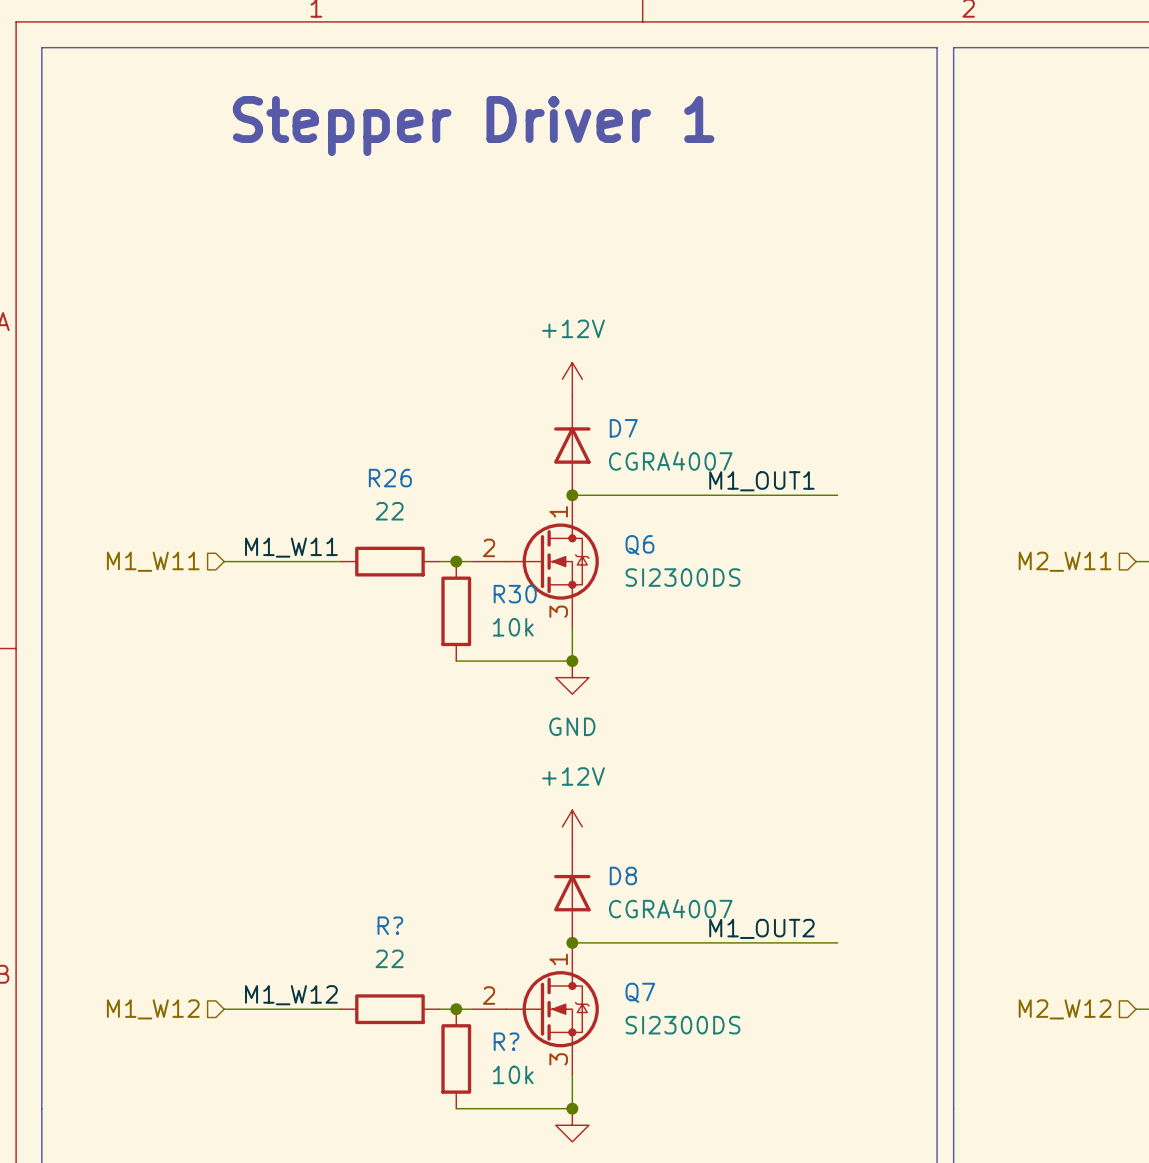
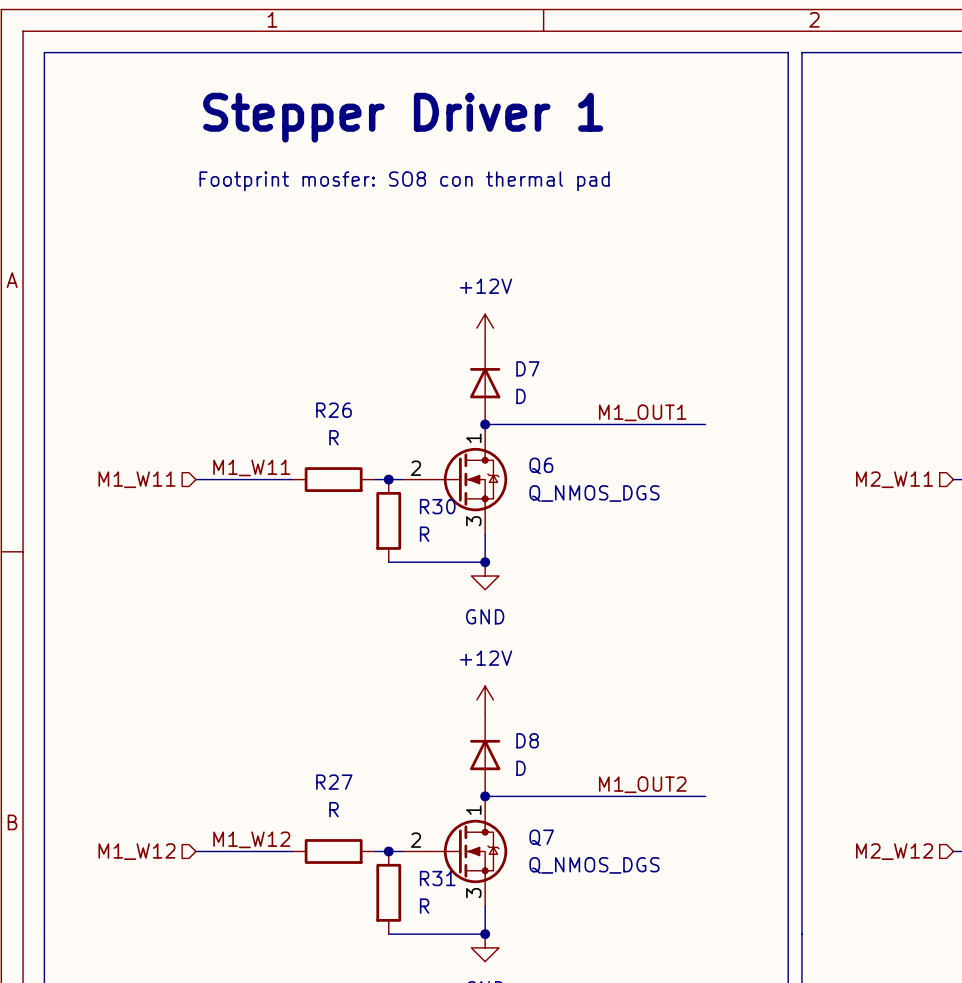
text: none -> Footprint mosfer: SO8 con thermal pad (404, 181)
D7 value: CGRA4007 (670, 461) -> D (521, 396)
R26 value: 22 (389, 511) -> R (333, 437)
Q6 value: SI2300DS (682, 577) -> Q_NMOS_DGS (594, 493)
R30 value: 10k (513, 627) -> R (424, 534)
D8 value: CGRA4007 (670, 908) -> D (521, 768)
R? name: R? (390, 925) -> R27 (334, 782)
R? value: 22 (389, 958) -> R (333, 809)
Q7 value: SI2300DS (682, 1025) -> Q_NMOS_DGS (594, 865)
R? name: R? (506, 1041) -> R31 (437, 878)
R? value: 10k (513, 1074) -> R (424, 906)

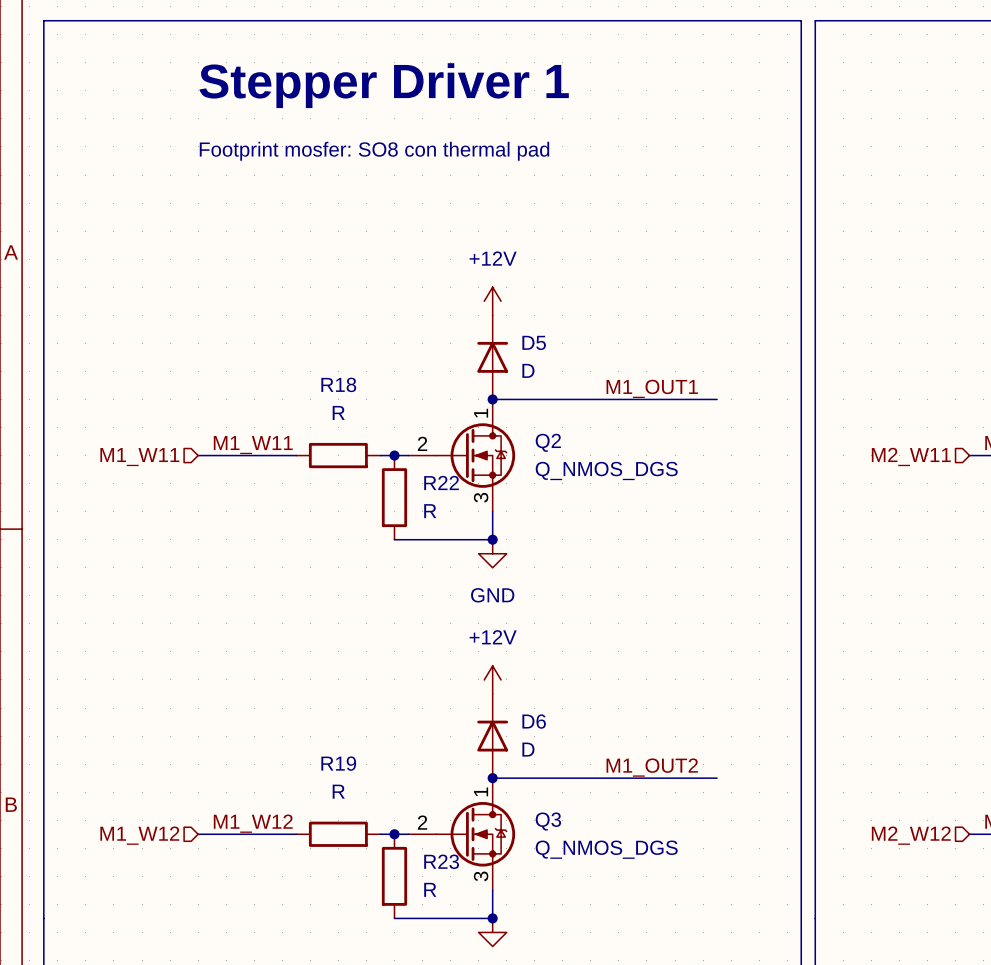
D7 name: D7 (527, 368) -> D5 (534, 342)
R26 name: R26 (333, 410) -> R18 (338, 384)
Q6 name: Q6 (541, 465) -> Q2 (548, 442)
R30 name: R30 (437, 506) -> R22 (441, 482)
D8 name: D8 (527, 740) -> D6 (534, 721)
R27 name: R27 (334, 782) -> R19 (338, 763)
Q7 name: Q7 (541, 837) -> Q3 (548, 821)
R31 name: R31 (437, 878) -> R23 (441, 861)

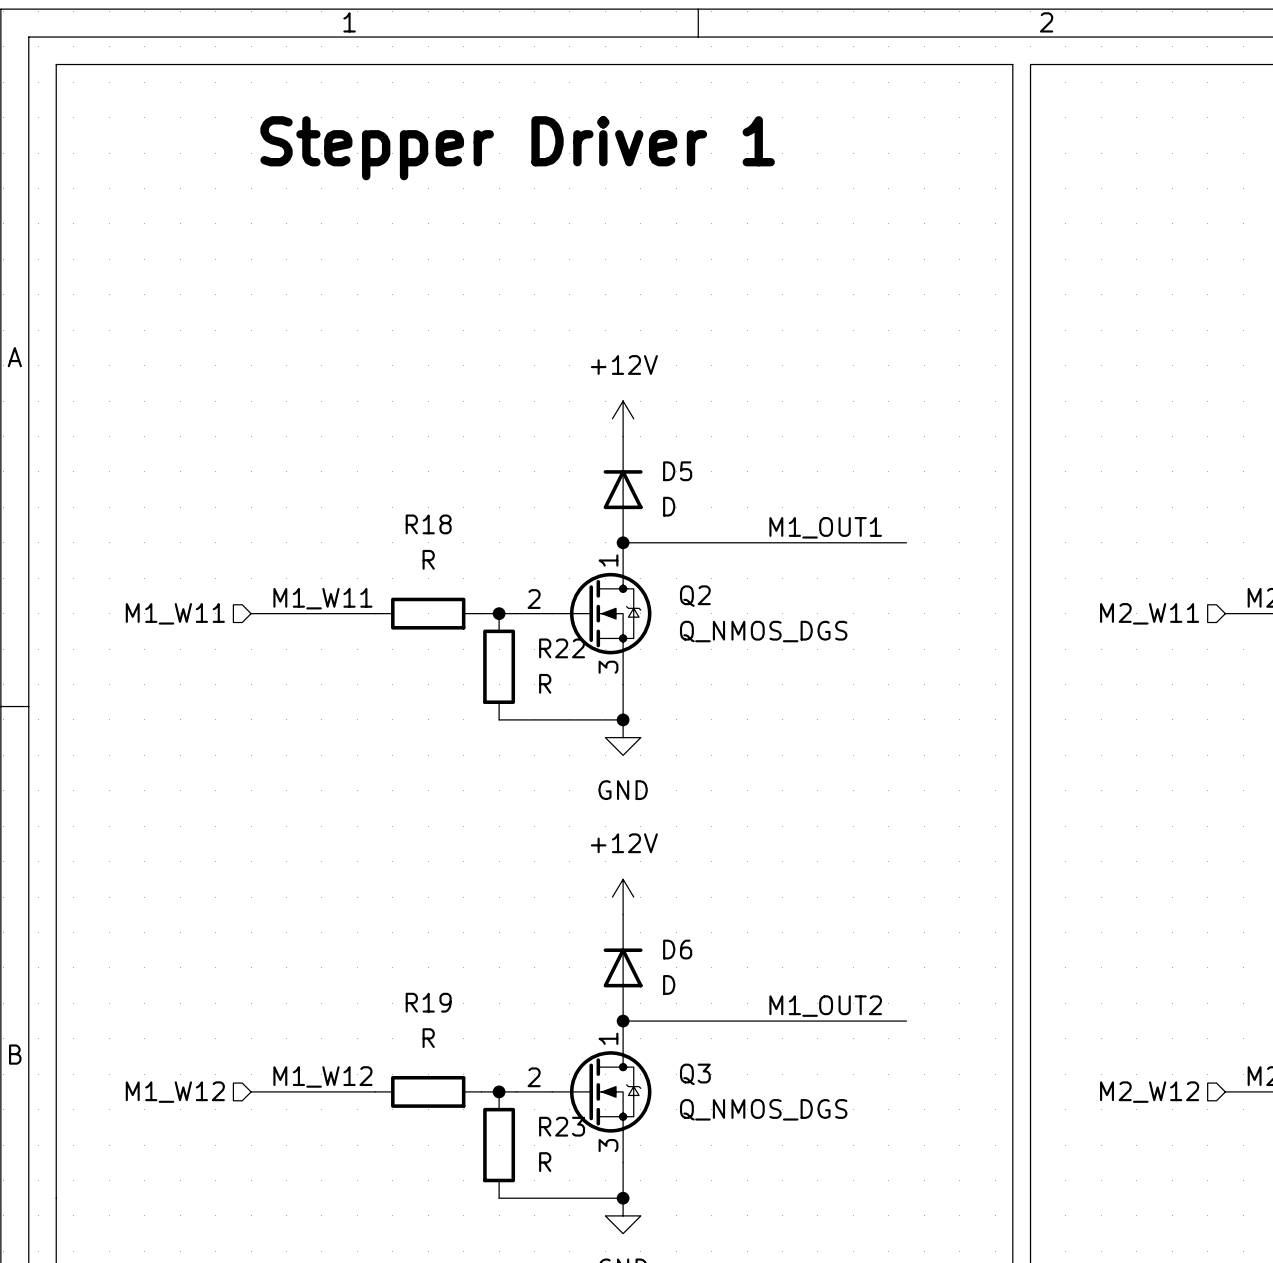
text: Footprint mosfer: SO8 con thermal pad (374, 151) -> none

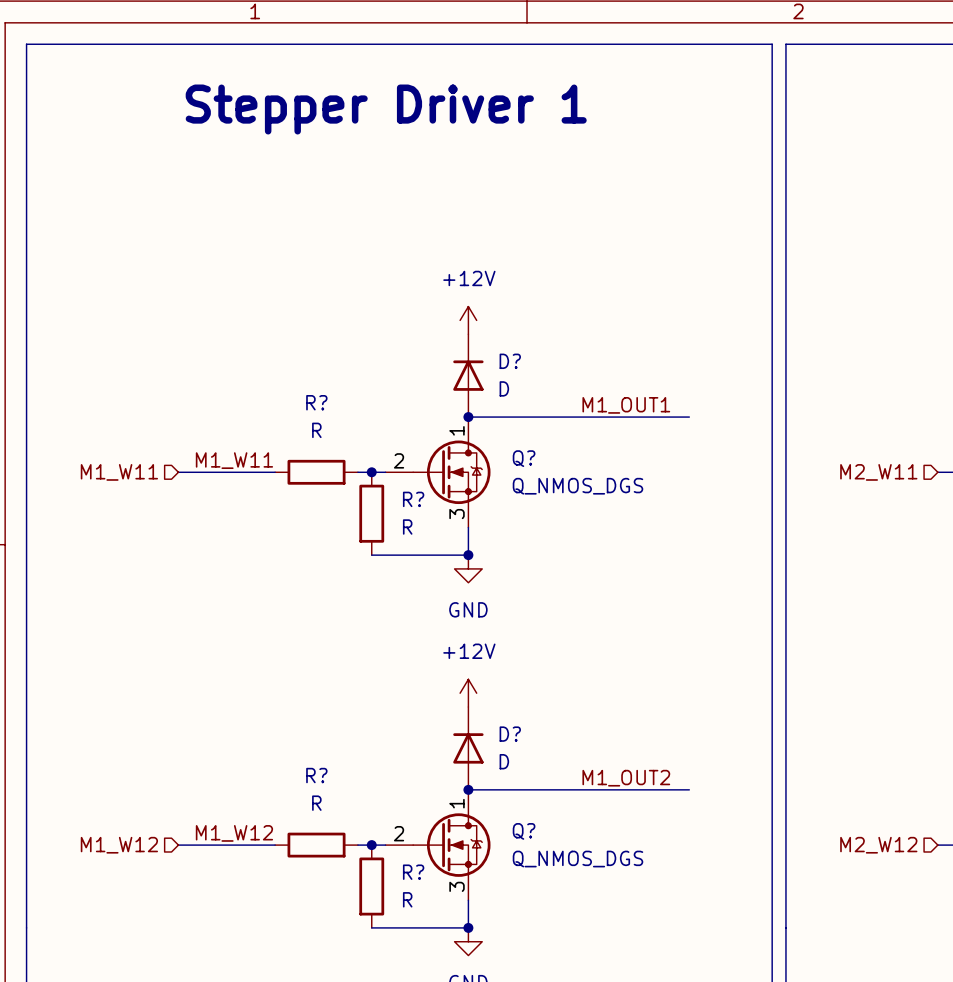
D5 name: D5 (677, 471) -> D? (510, 361)
R18 name: R18 (428, 524) -> R? (316, 402)
Q2 name: Q2 (695, 596) -> Q? (524, 458)
R22 name: R22 (562, 648) -> R? (413, 499)
D6 name: D6 (677, 949) -> D? (510, 734)
R19 name: R19 (428, 1002) -> R? (316, 775)
Q3 name: Q3 (695, 1074) -> Q? (524, 831)
R23 name: R23 (562, 1126) -> R? (413, 872)

